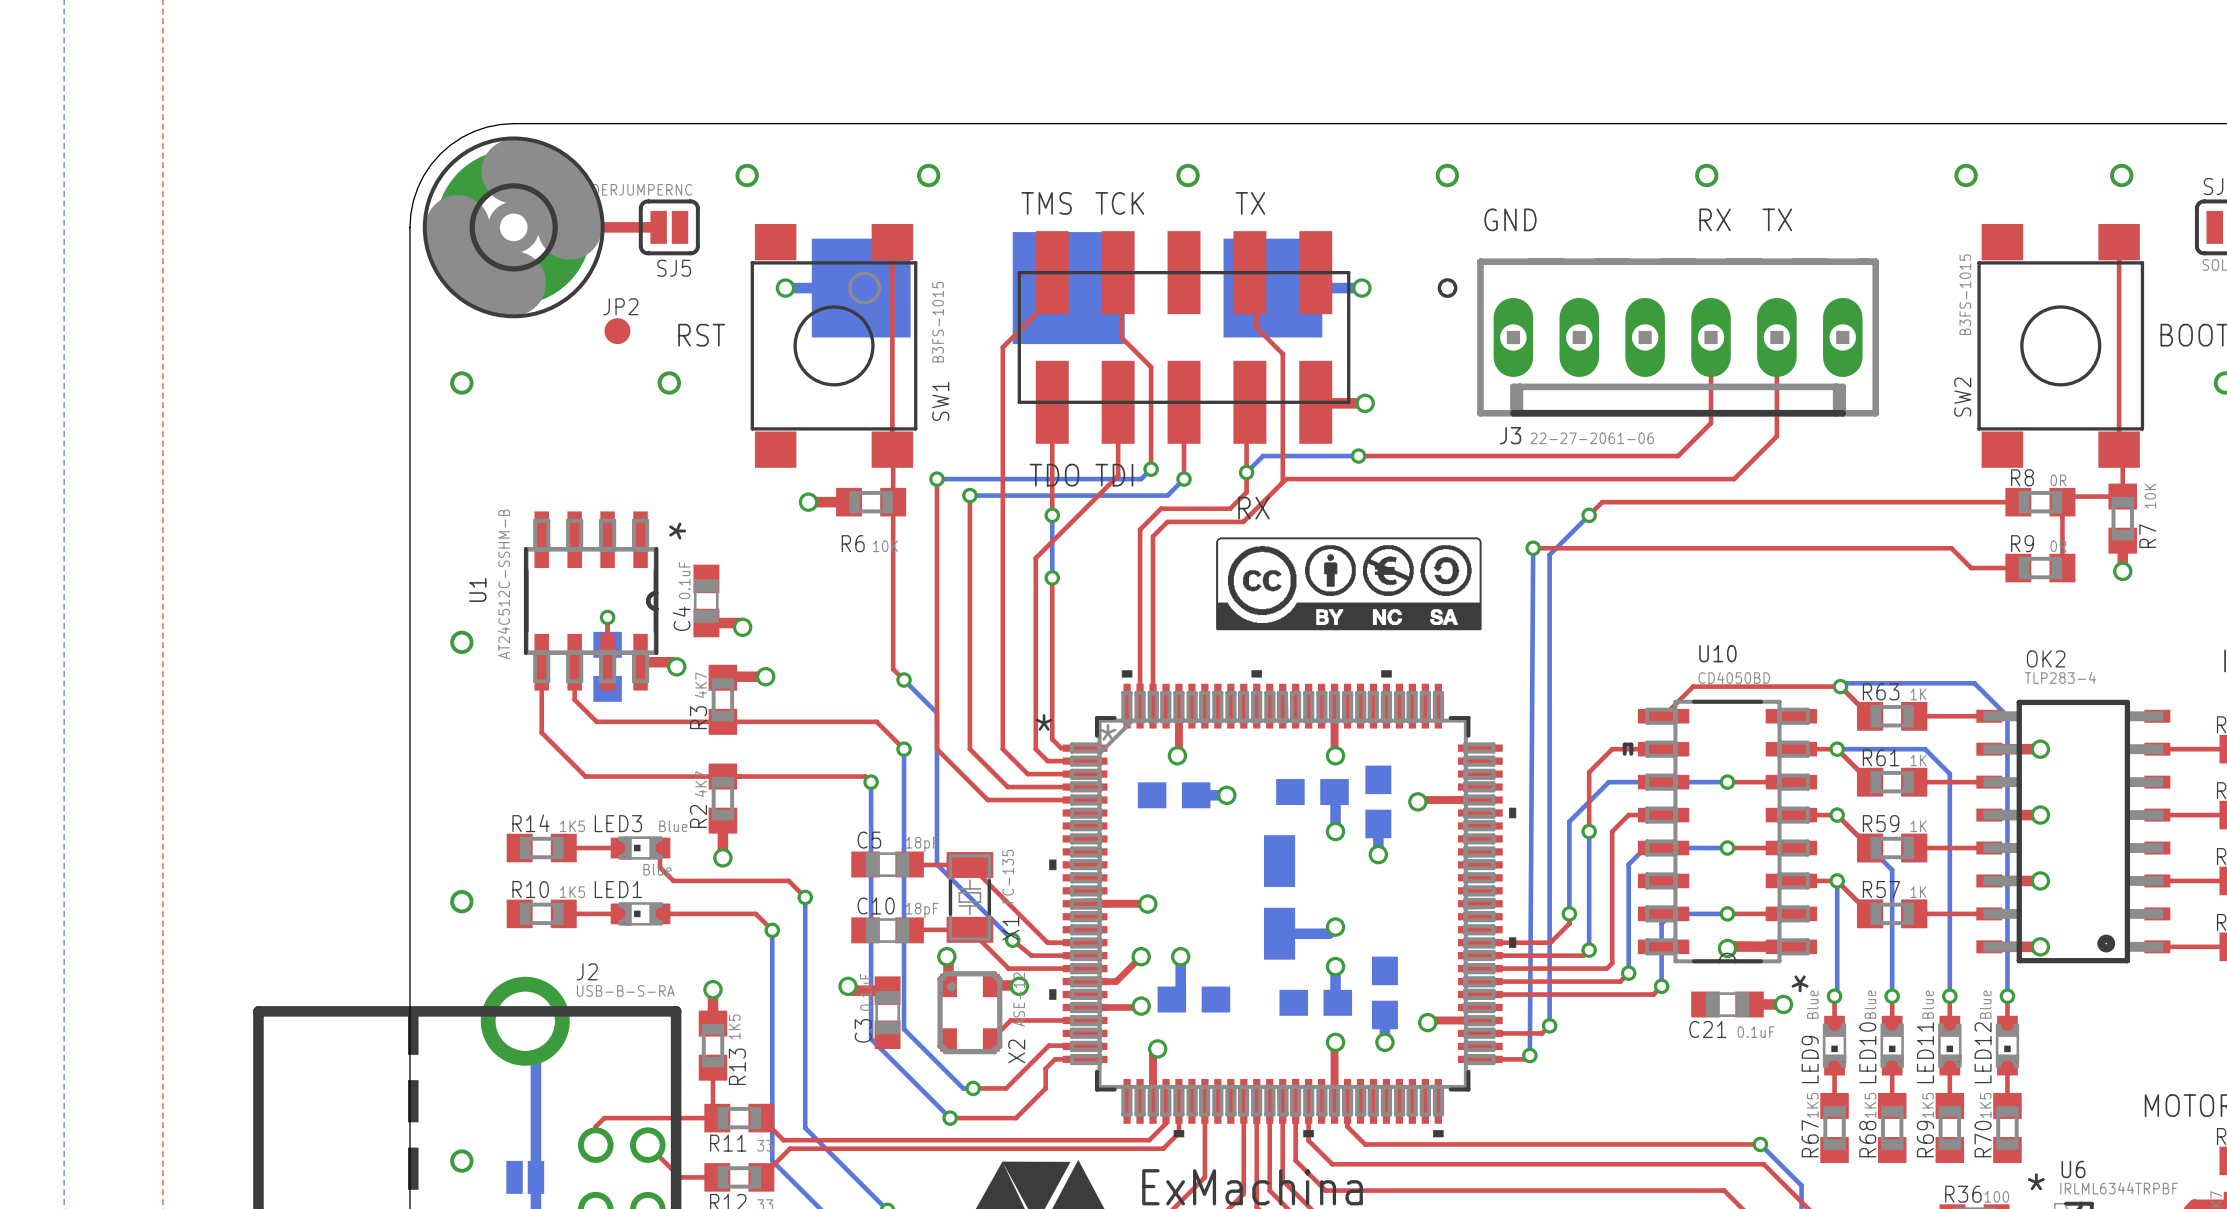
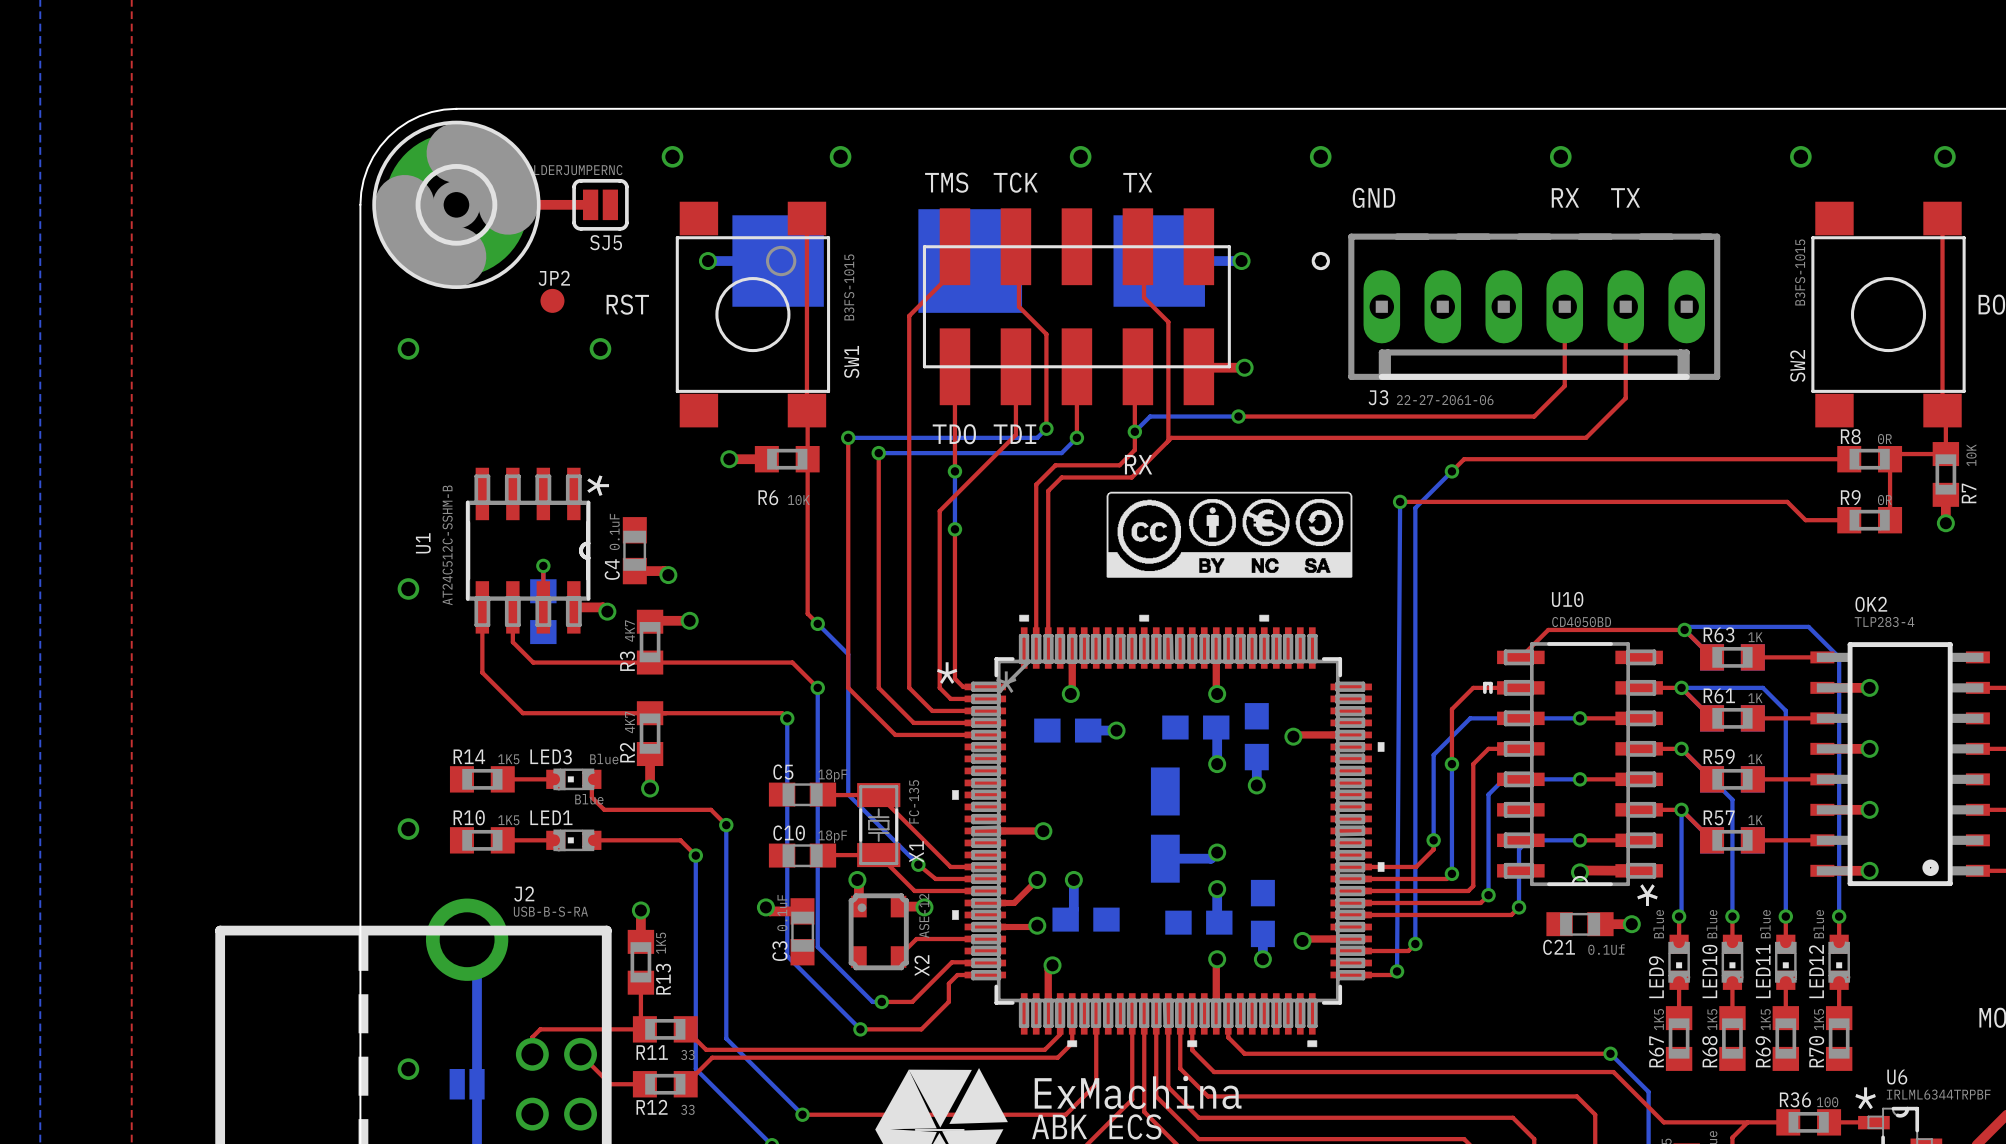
C21 value: 0.1uF (1756, 1032) -> 0.1Uf (1606, 949)

